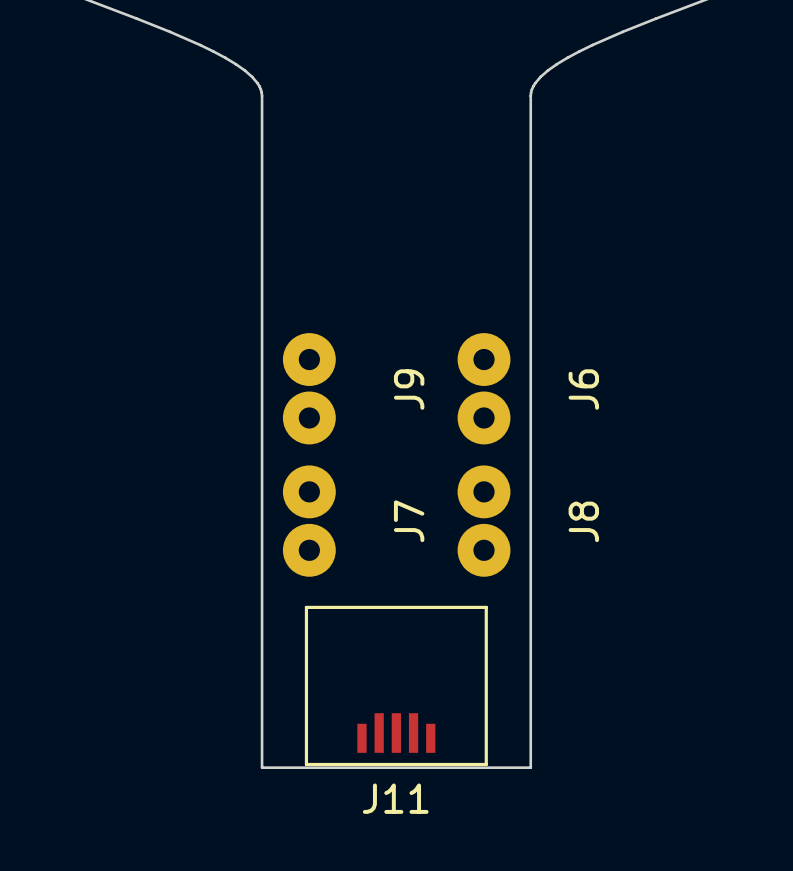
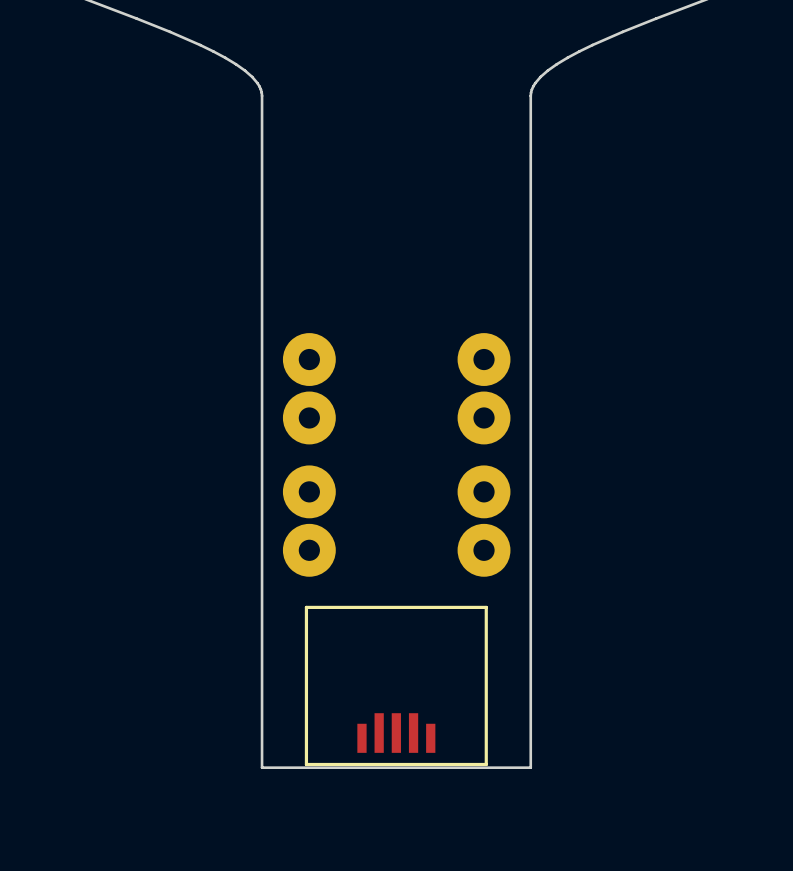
J9 name: J9 (409, 389) -> none
J6 name: J6 (583, 389) -> none
J7 name: J7 (409, 521) -> none
J8 name: J8 (583, 521) -> none
J11 name: J11 (395, 798) -> none

